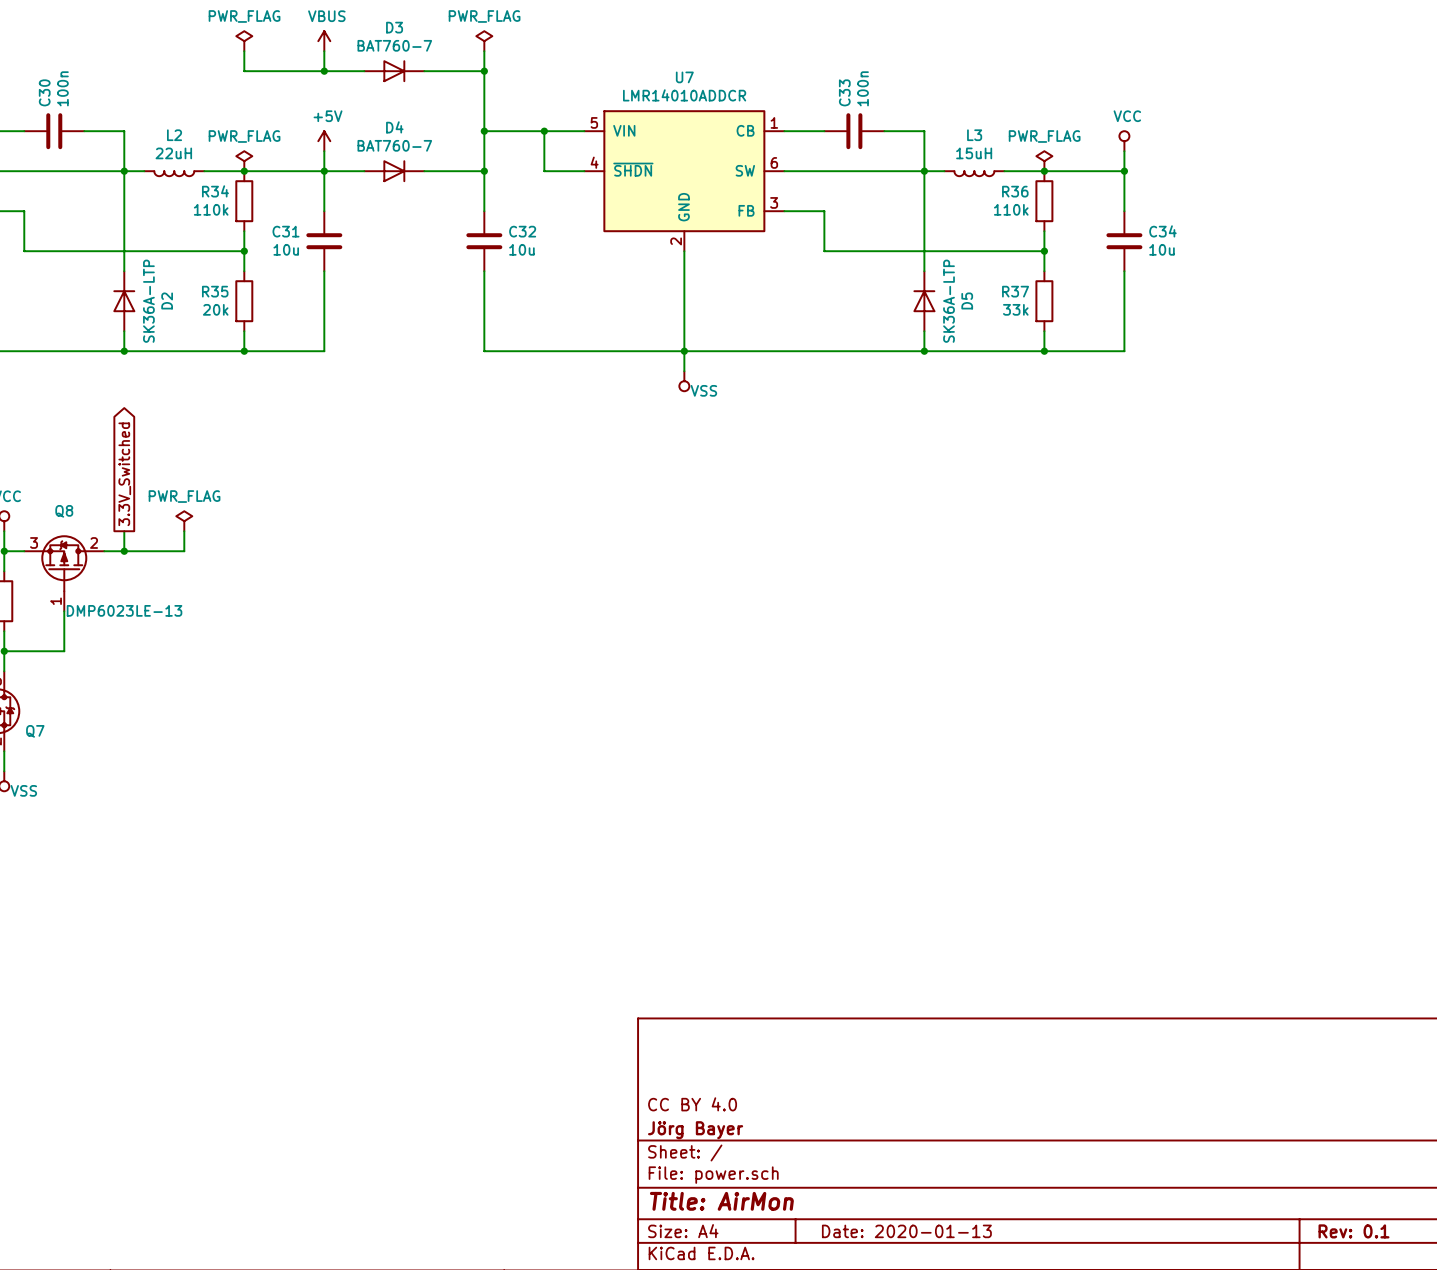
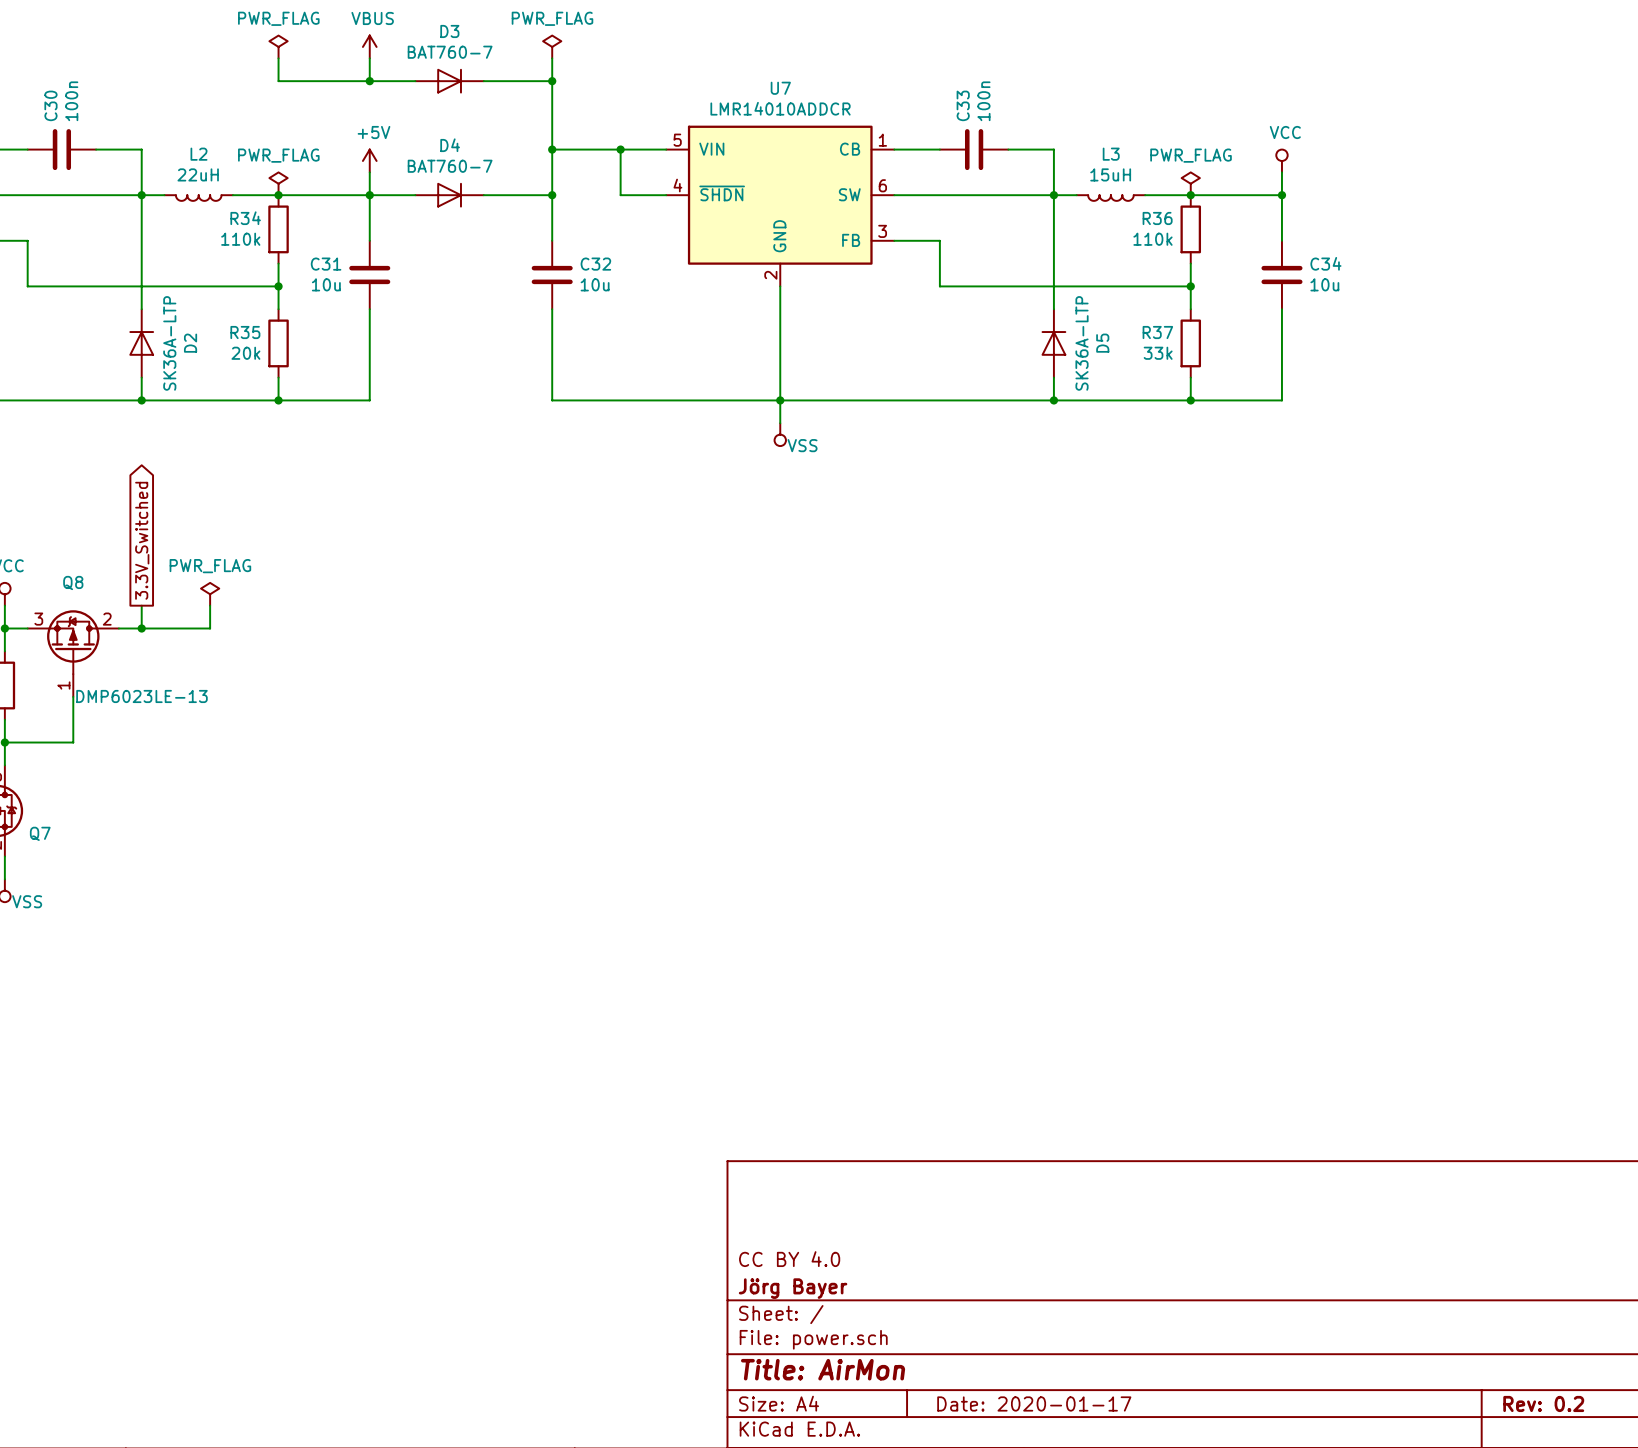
title block: Date: 2020-01-13 (906, 1231) -> Date: 2020-01-17 (1034, 1403)
title block: Rev: 0.1 (1353, 1231) -> Rev: 0.2 (1543, 1403)

